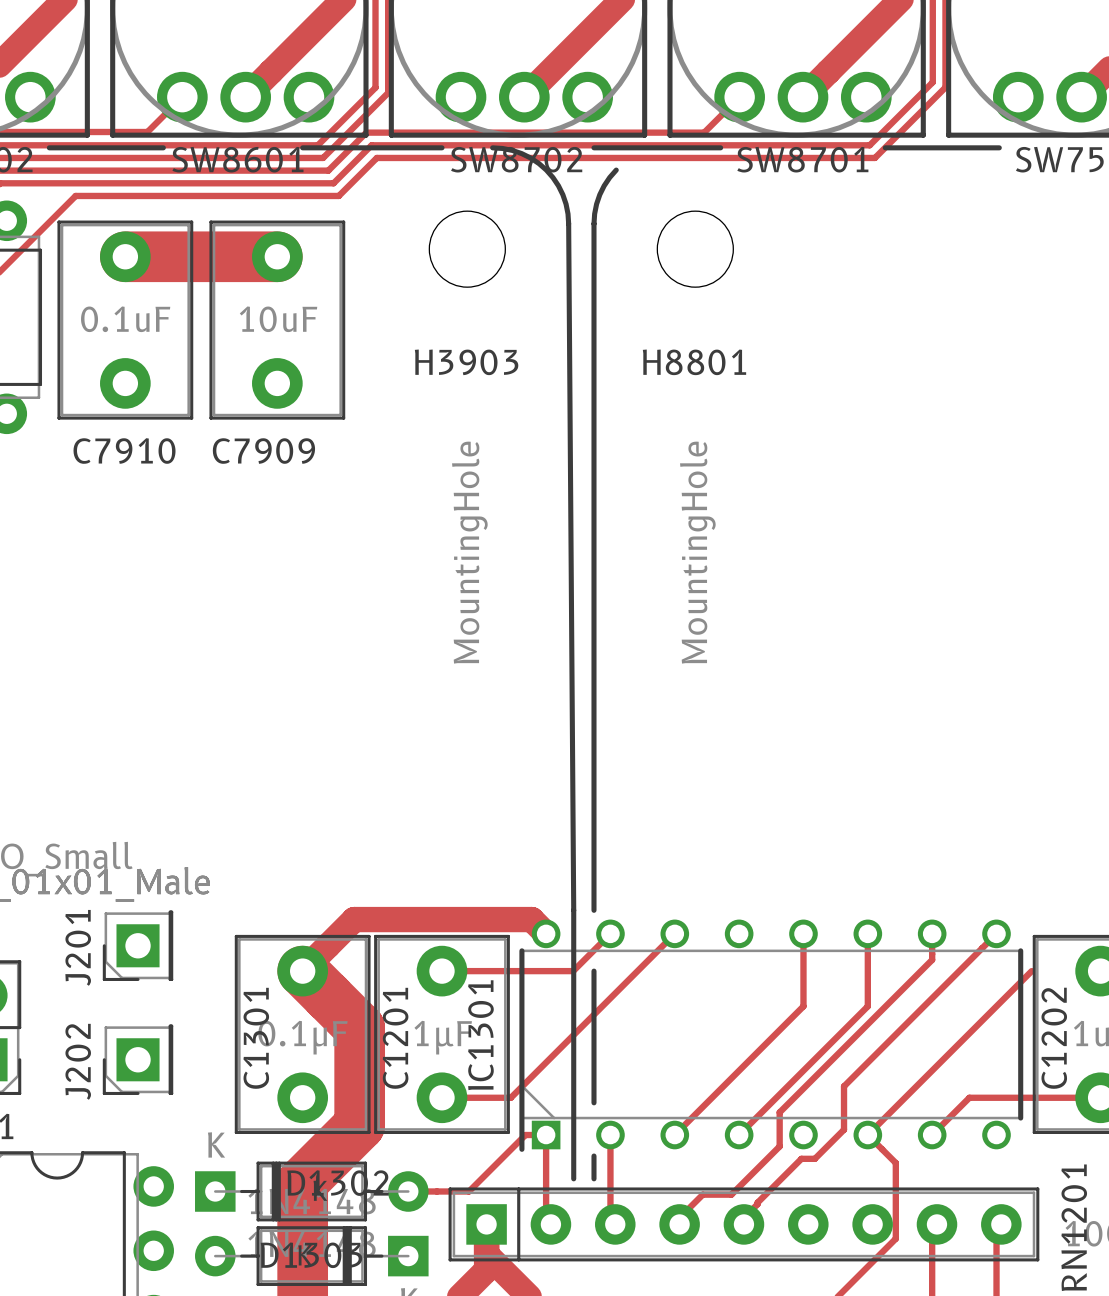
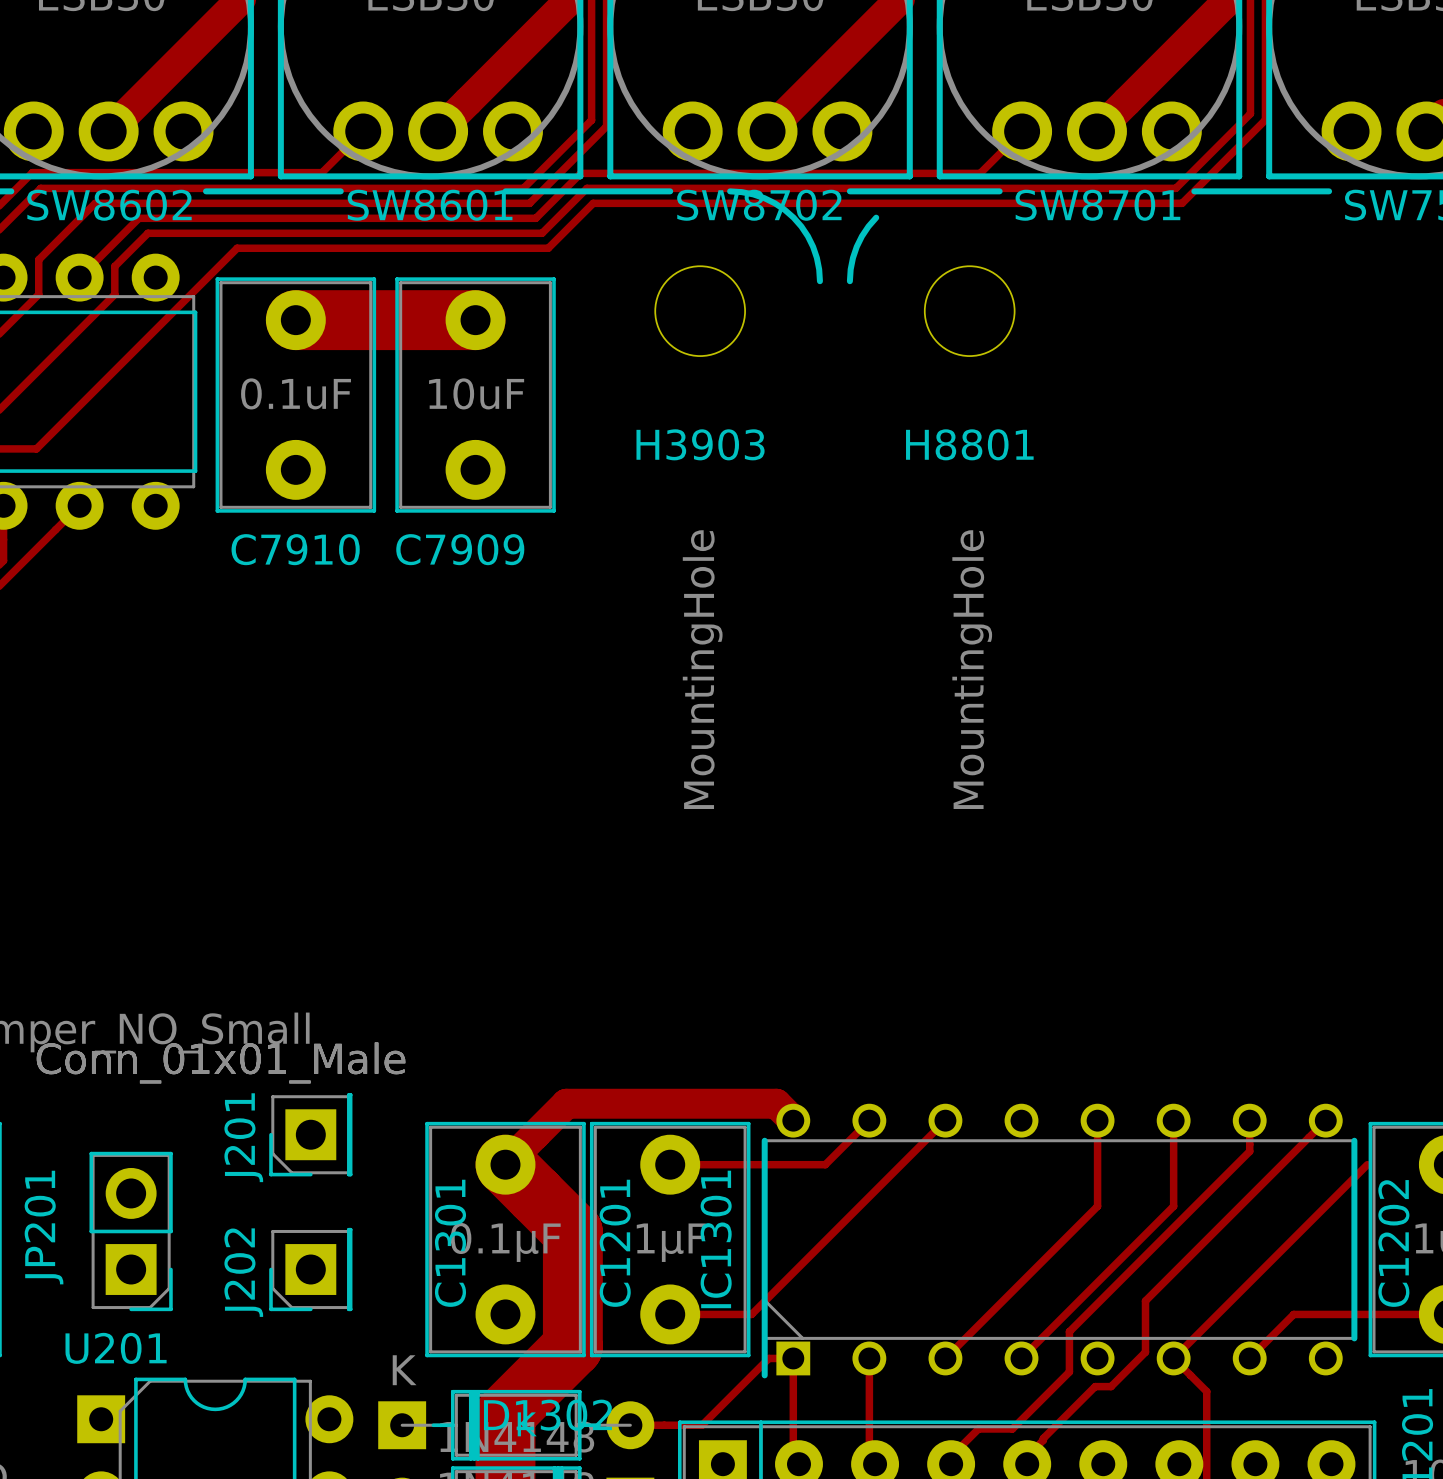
line: (568, 223) (573, 1178) -> none
line: (593, 223) (593, 910) -> none
line: (593, 971) (593, 1102) -> none
line: (593, 1156) (593, 1178) -> none

